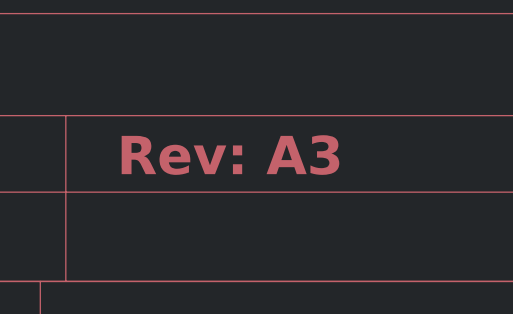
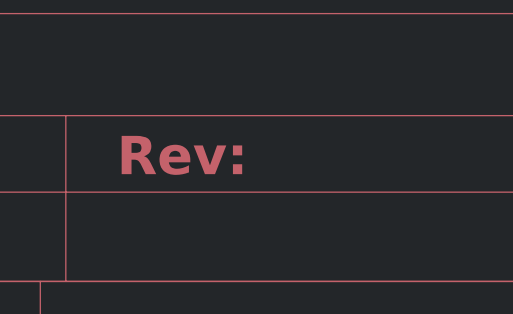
title block: Rev: A3 (230, 155) -> Rev: (181, 155)

